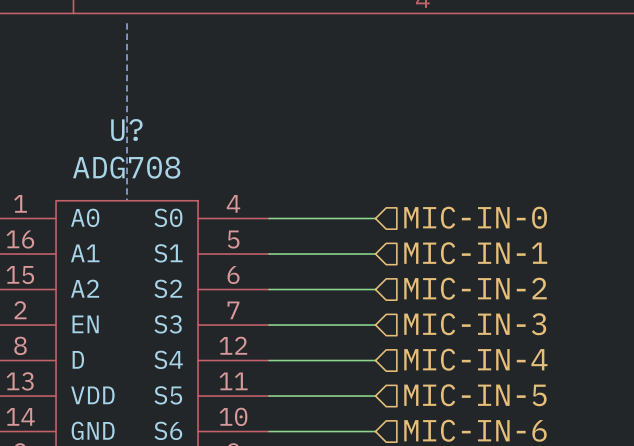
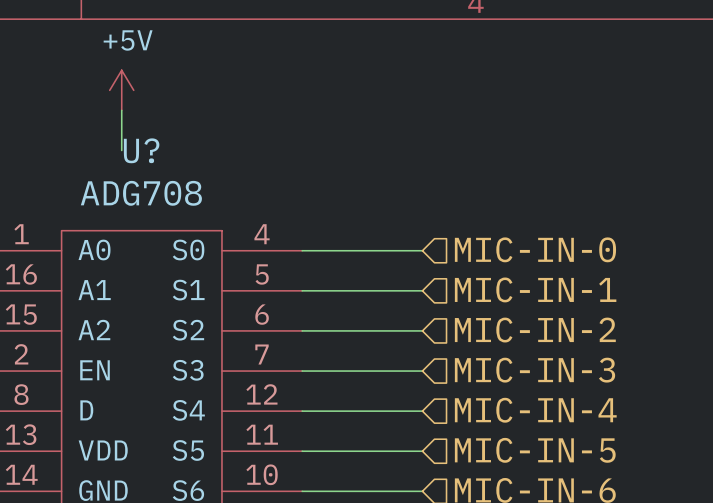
line: (127, 23) (127, 200) -> none
power symbol: none -> +5V (121, 90)
wire: none -> (121, 110) (121, 150)

